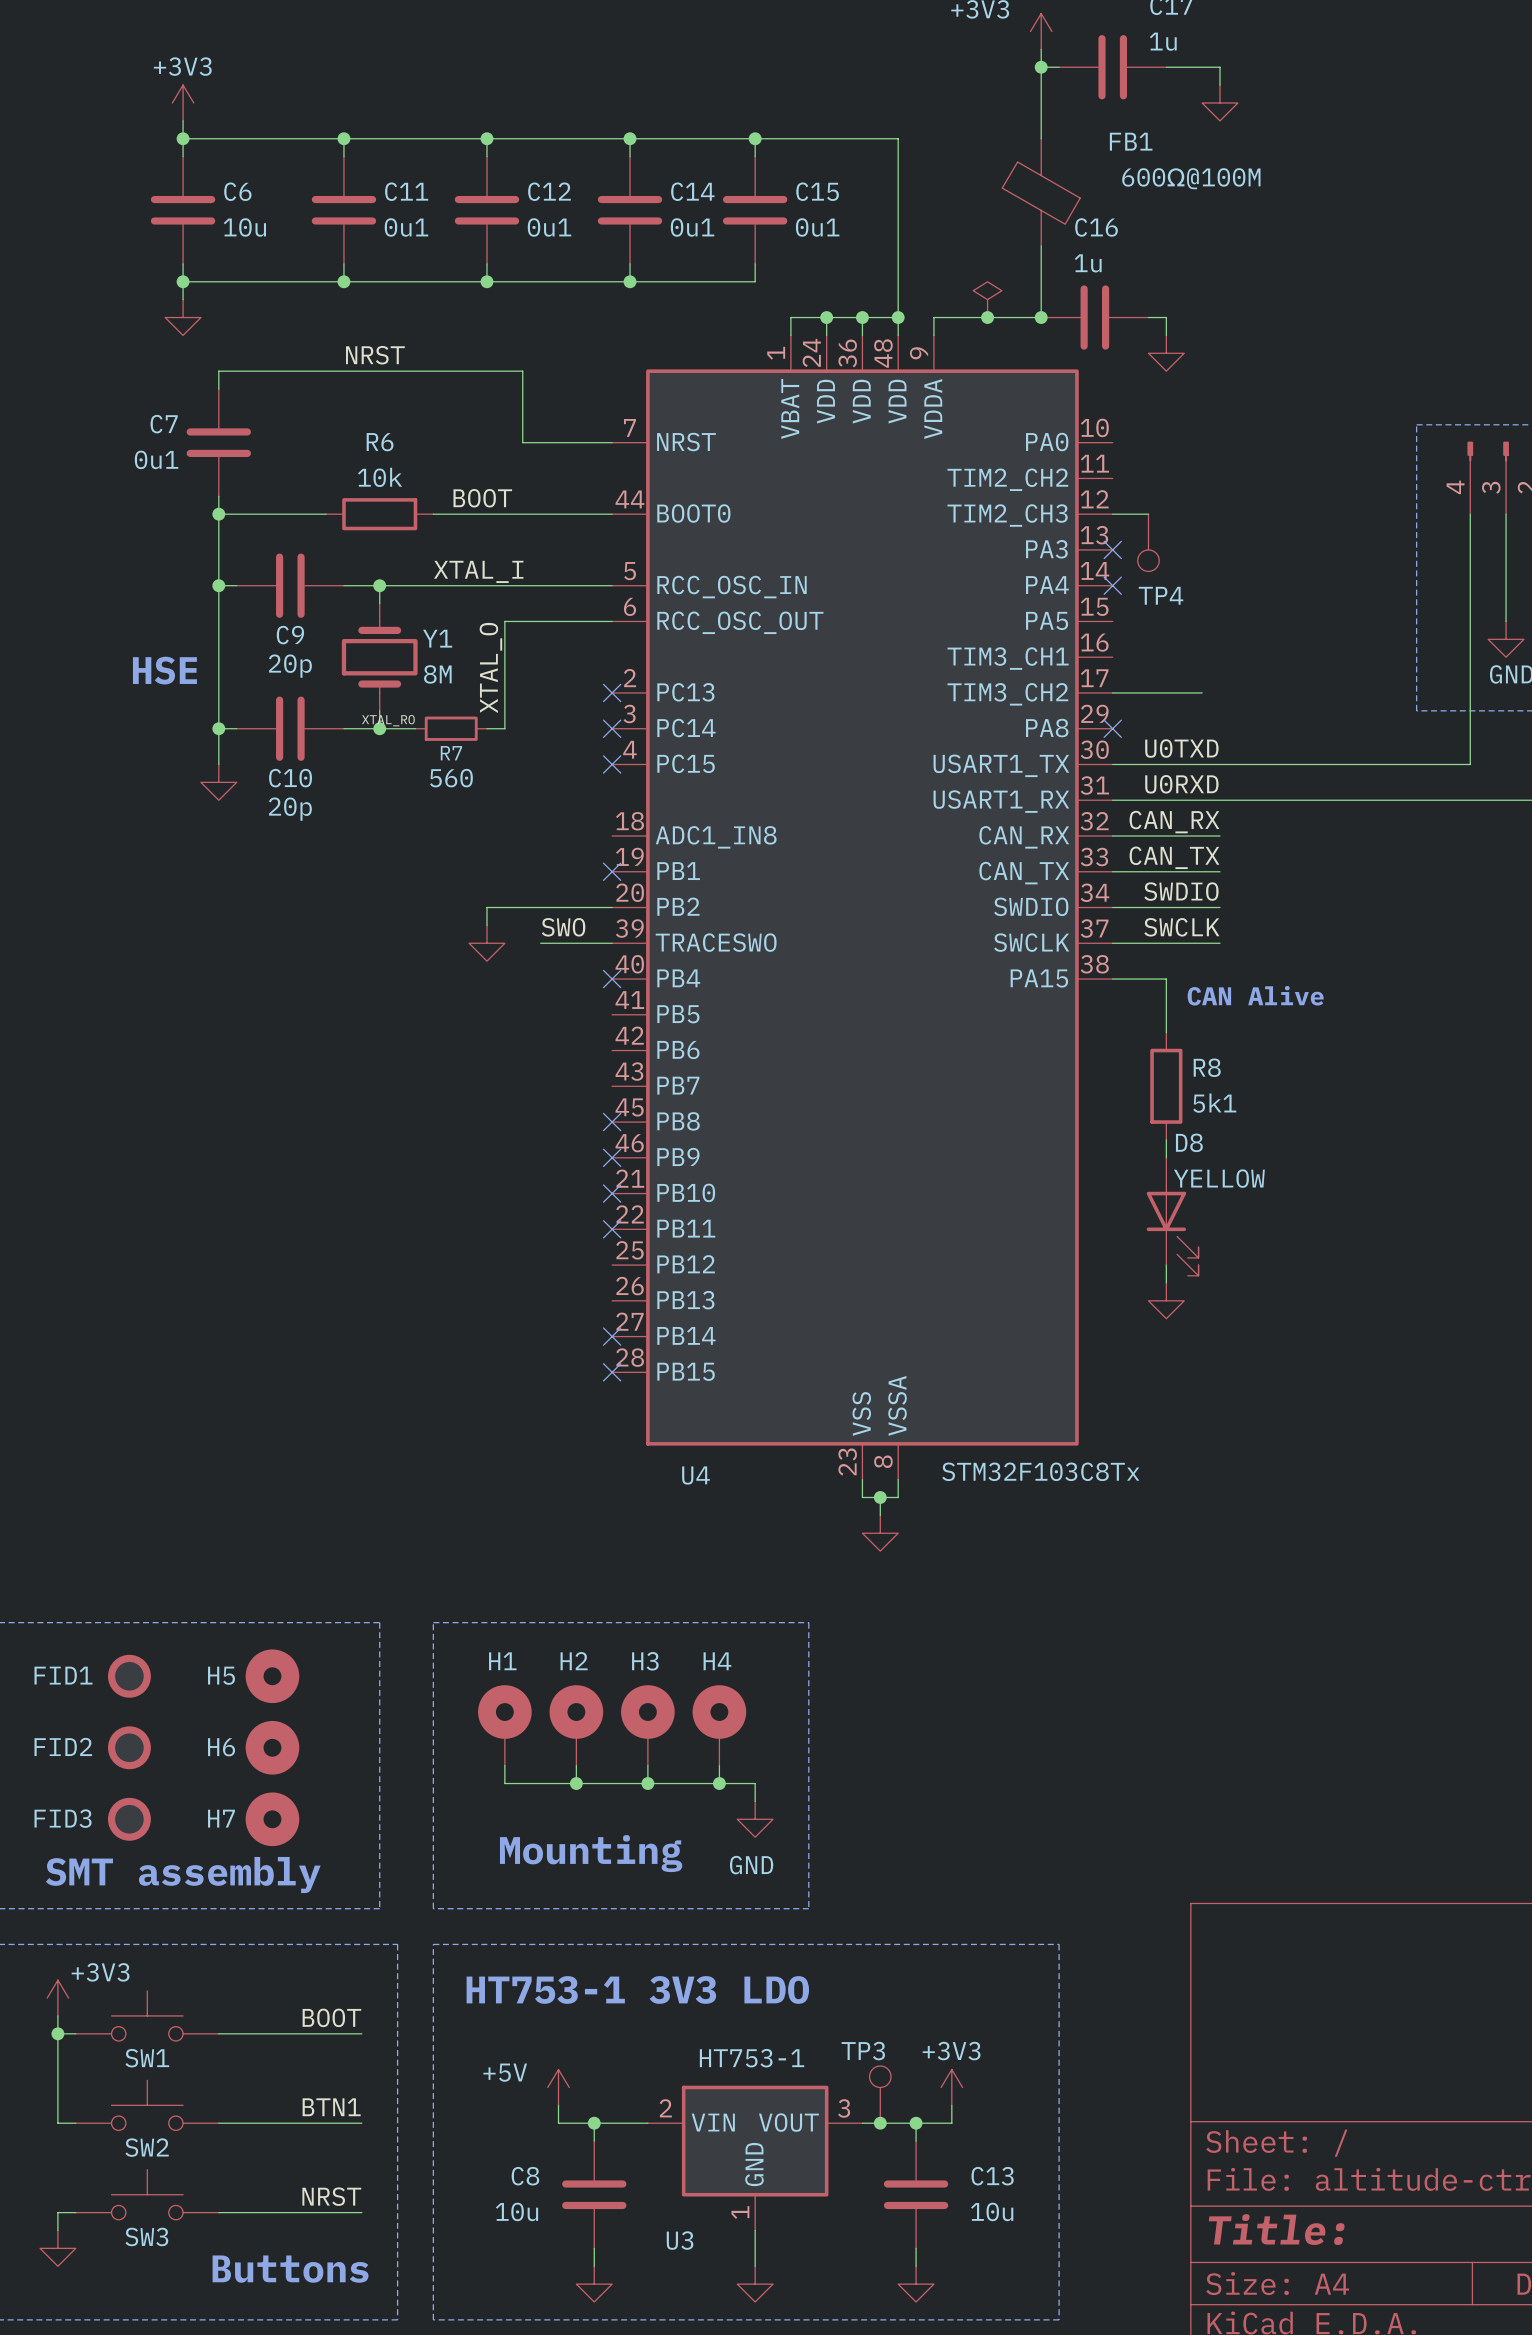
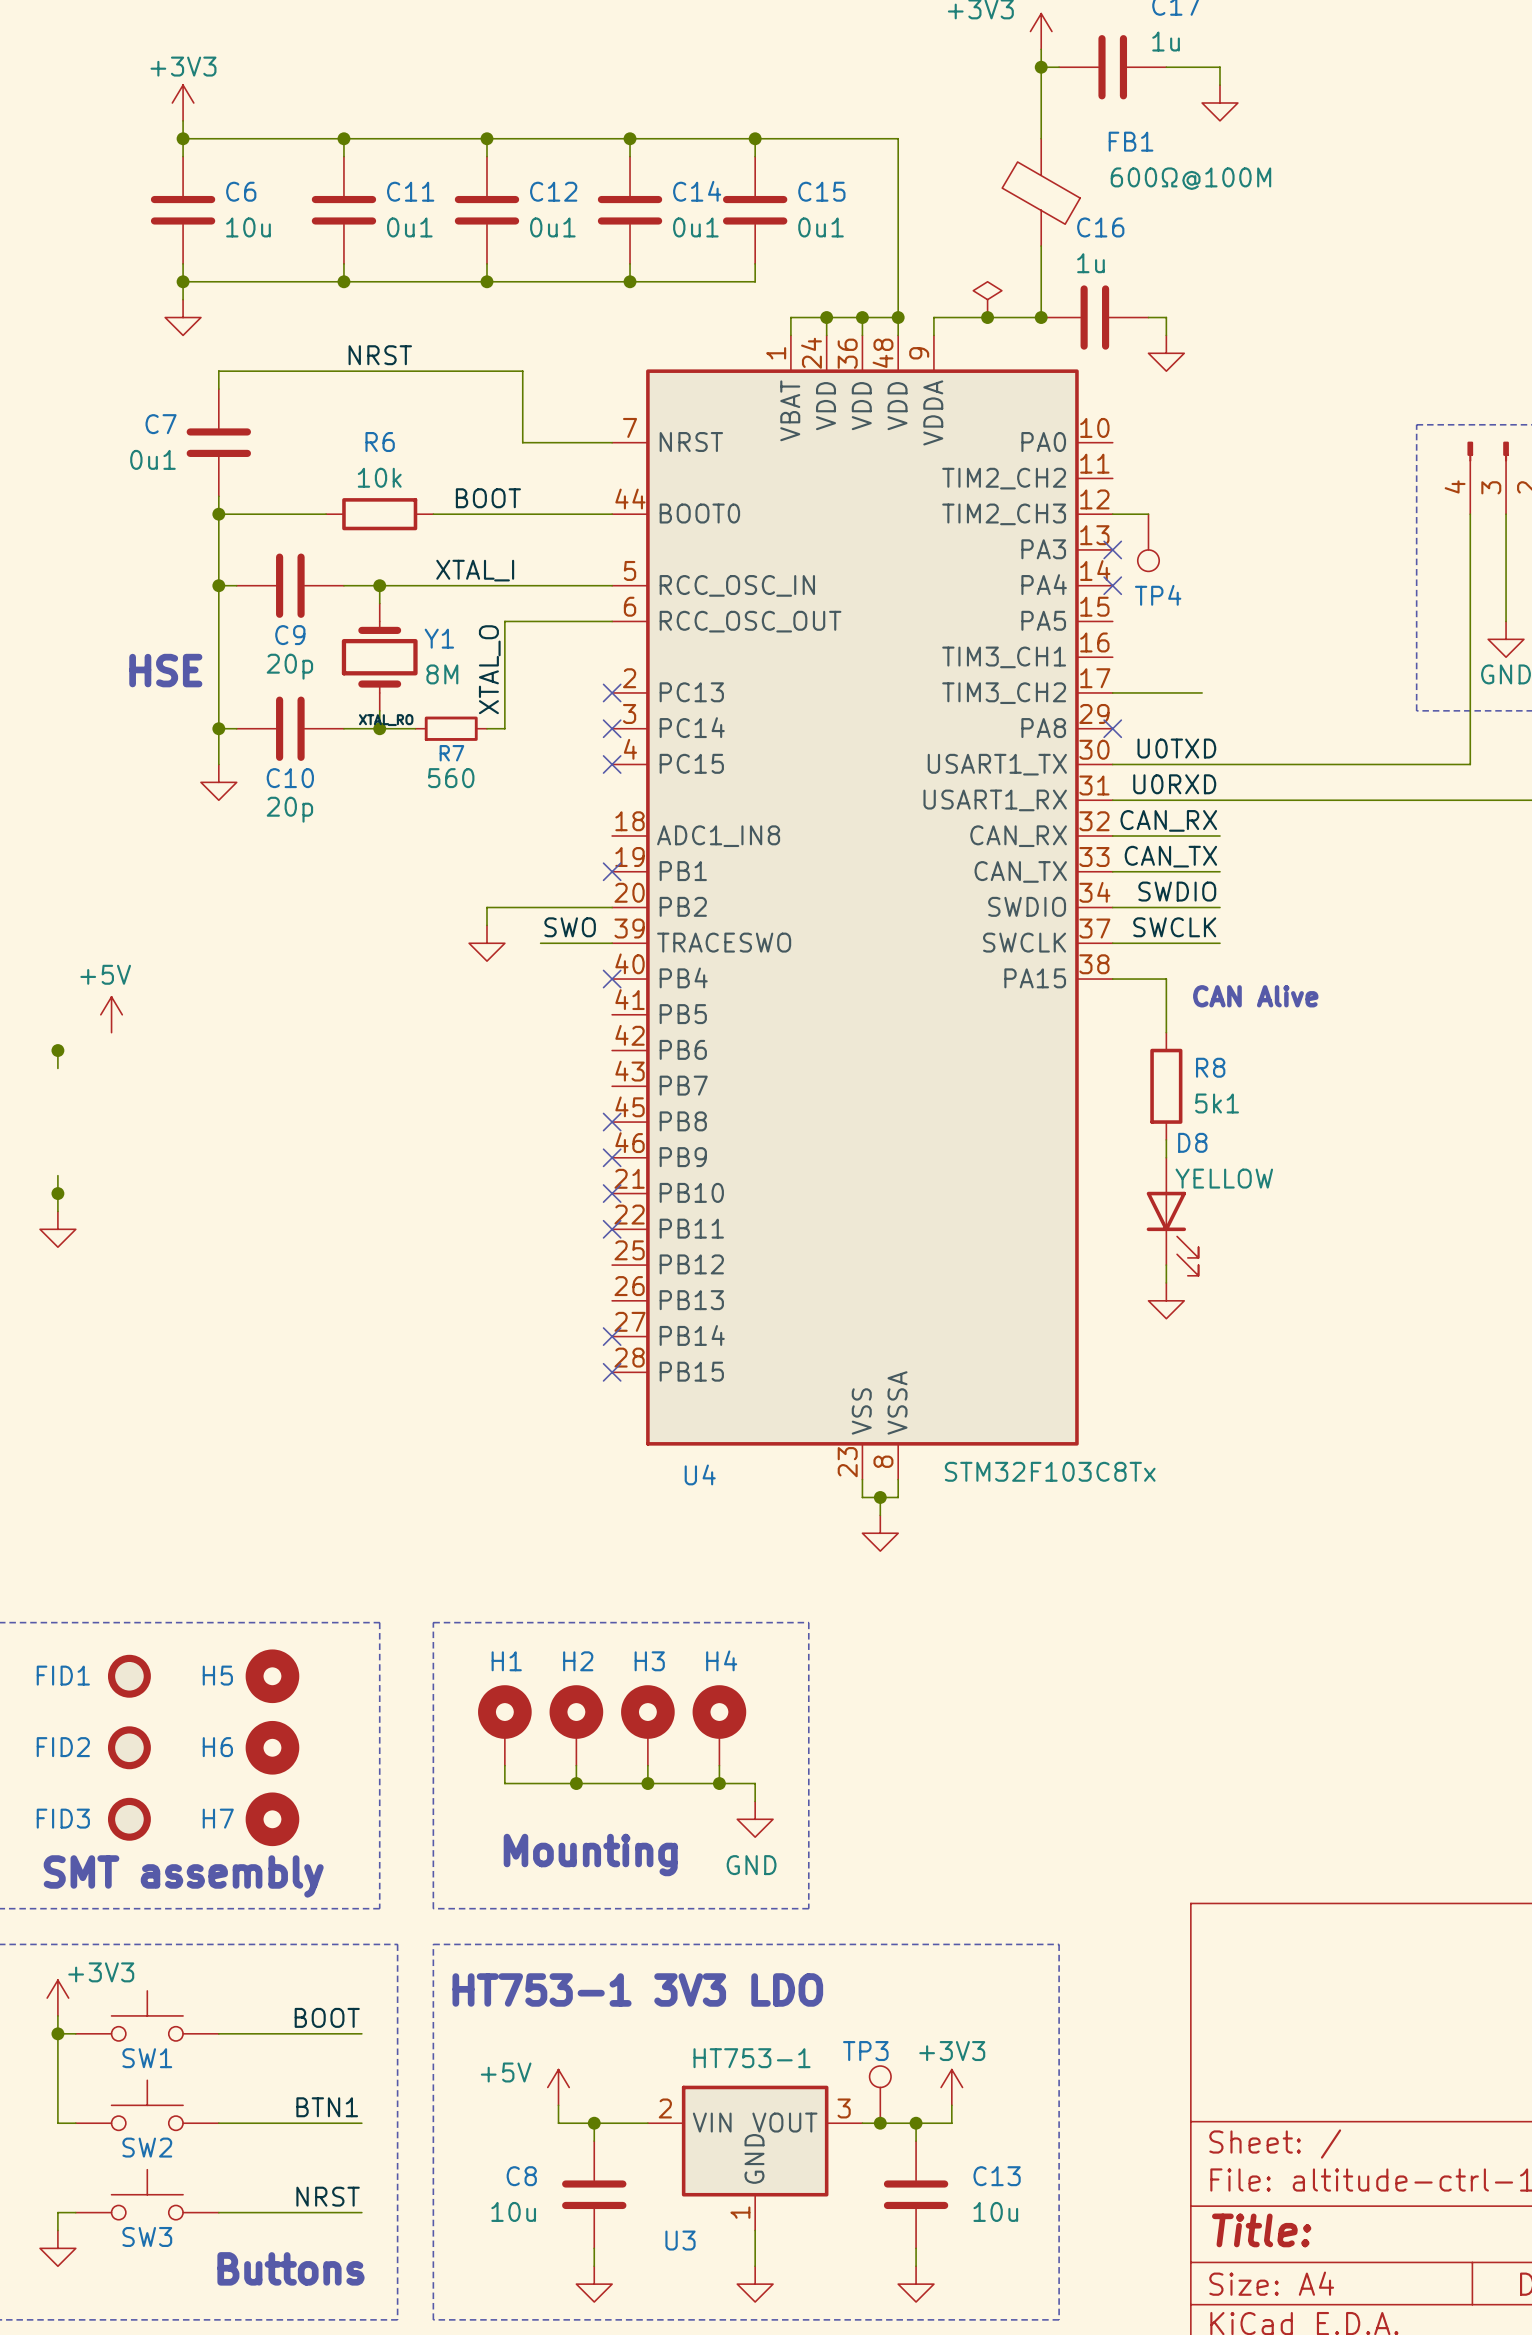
power symbol: none -> +5V (111, 1014)
wire: none -> (57, 1050) (57, 1068)
junction: none -> (57, 1050)
wire: none -> (57, 1175) (57, 1211)
junction: none -> (57, 1193)
power symbol: none -> (57, 1229)

